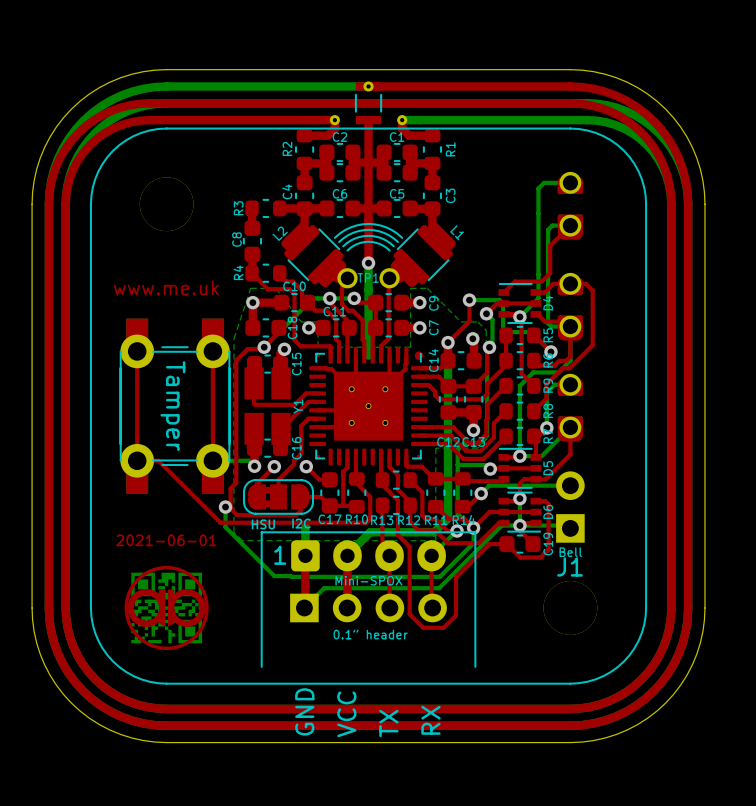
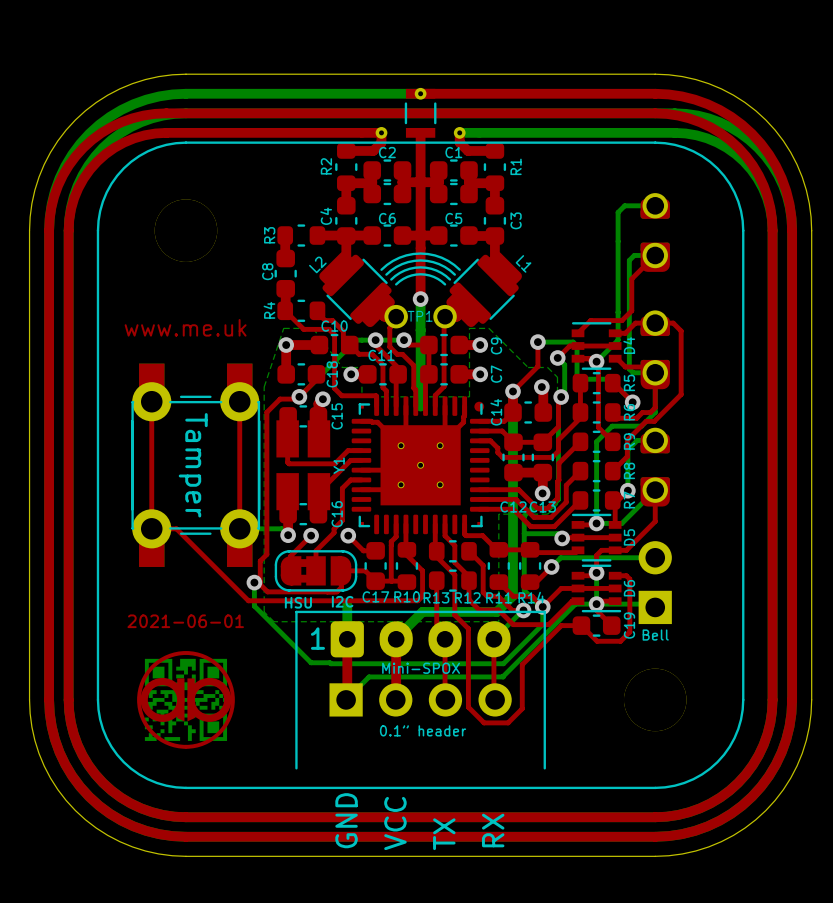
J1 name: J1 (570, 566) -> none

